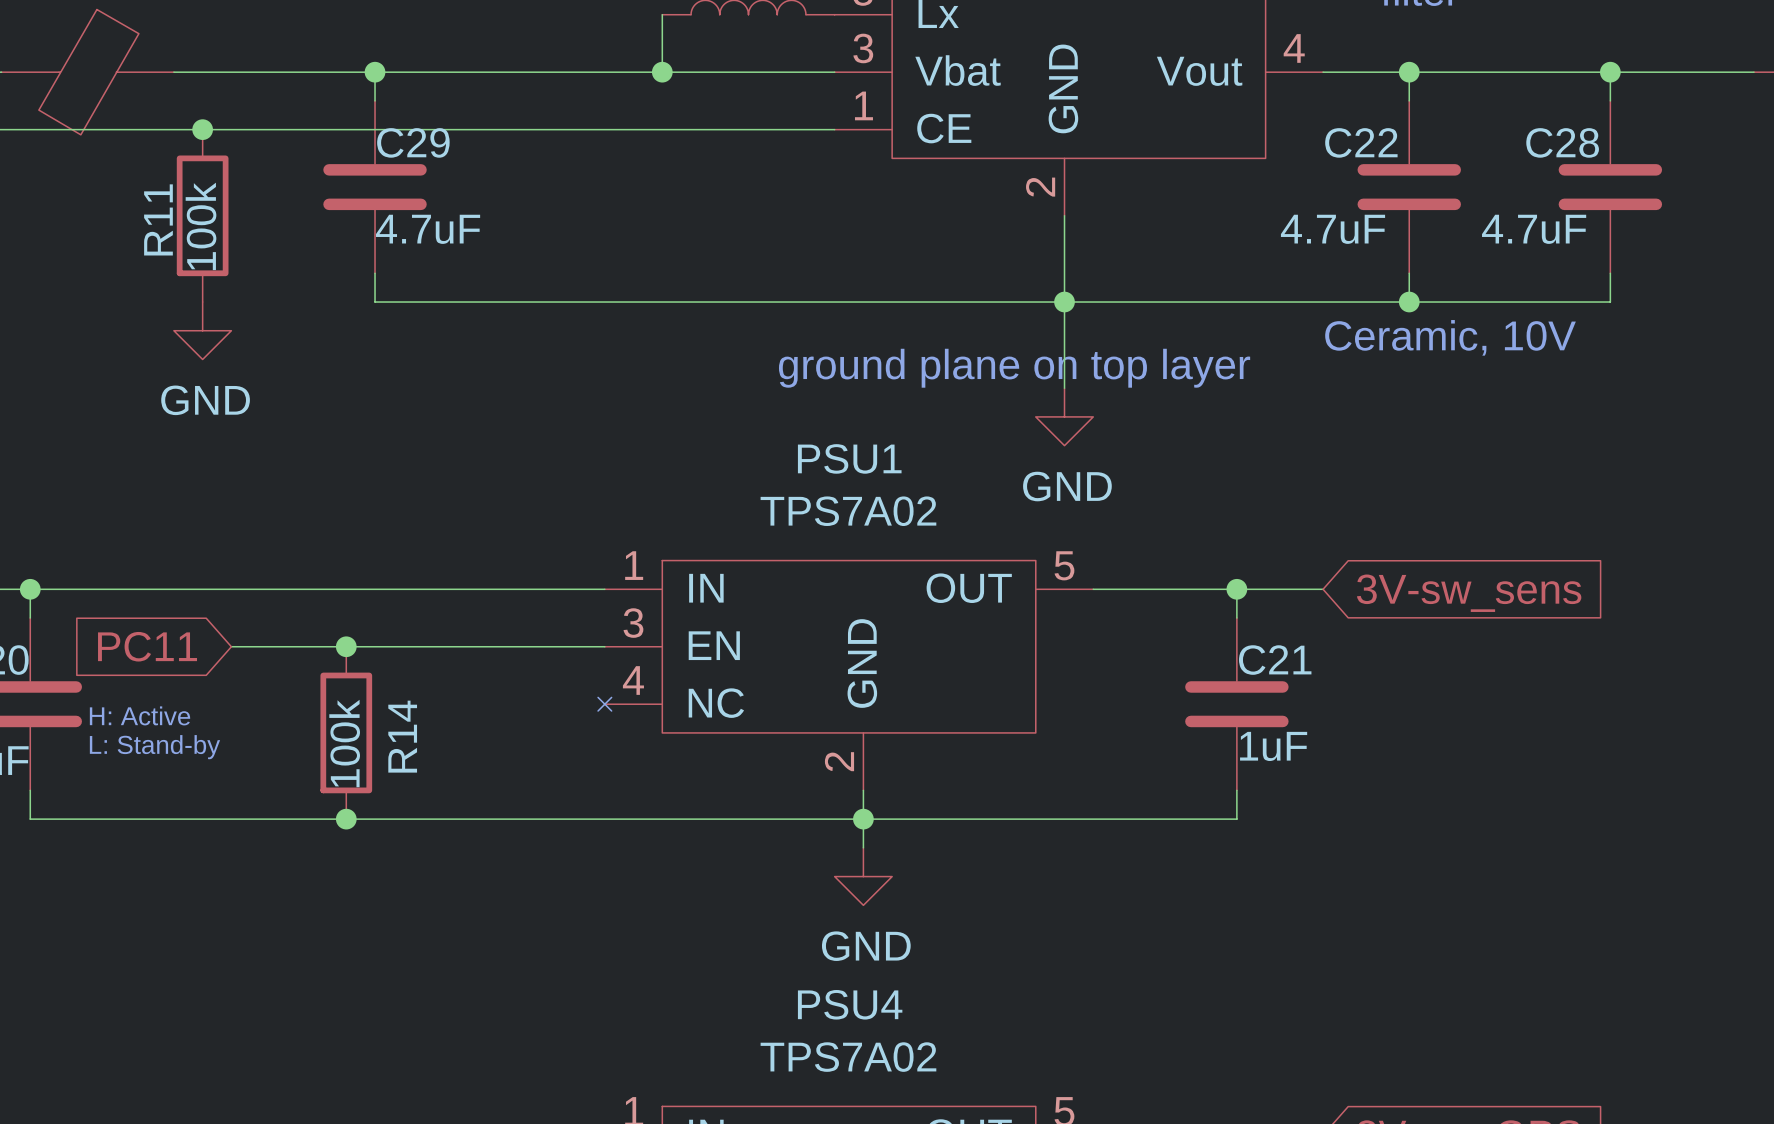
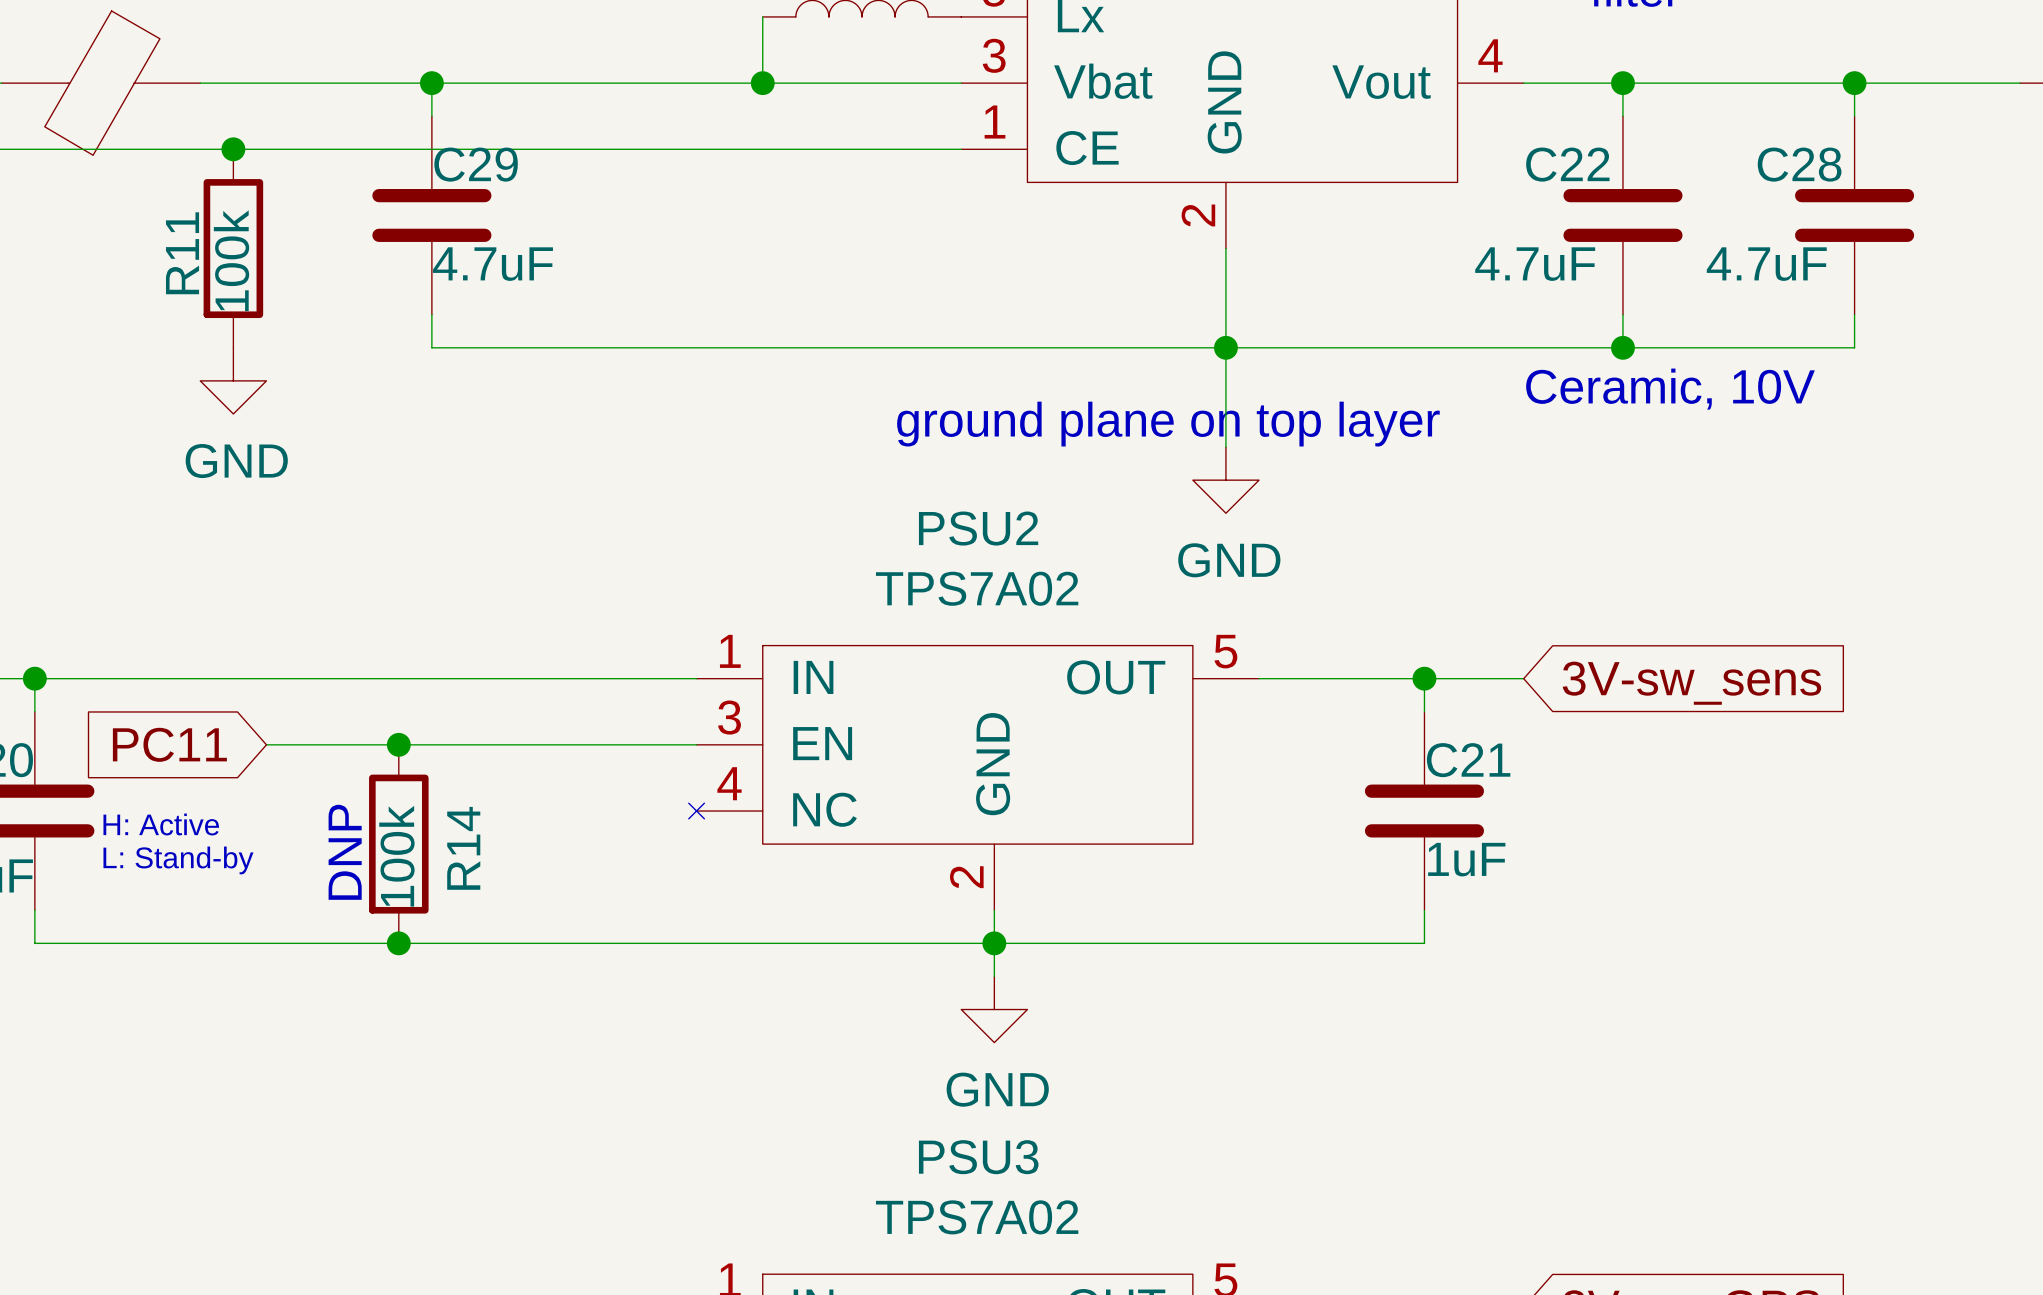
PSU1 name: PSU1 (849, 458) -> PSU2 (978, 528)
text: none -> DNP (345, 852)
PSU4 name: PSU4 (850, 1004) -> PSU3 (978, 1157)

